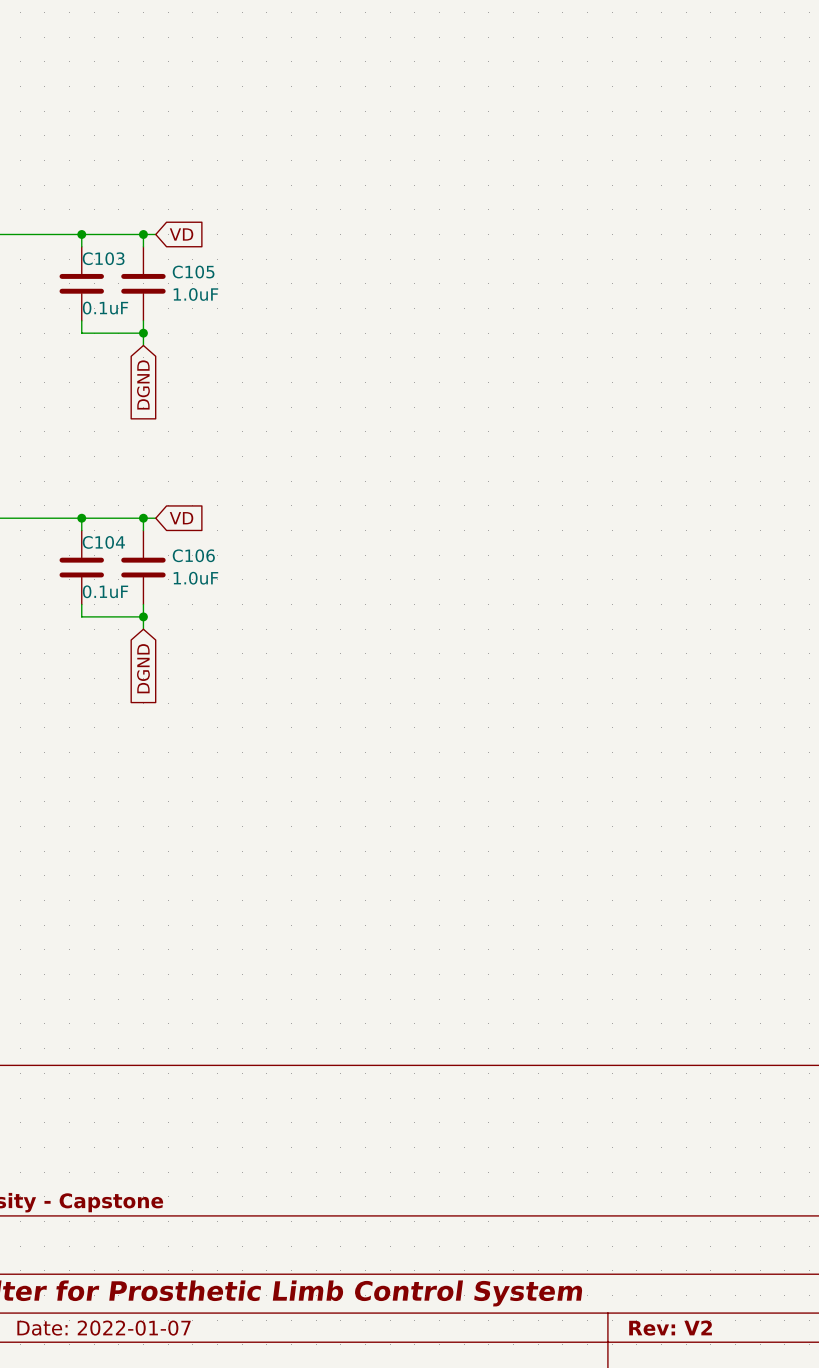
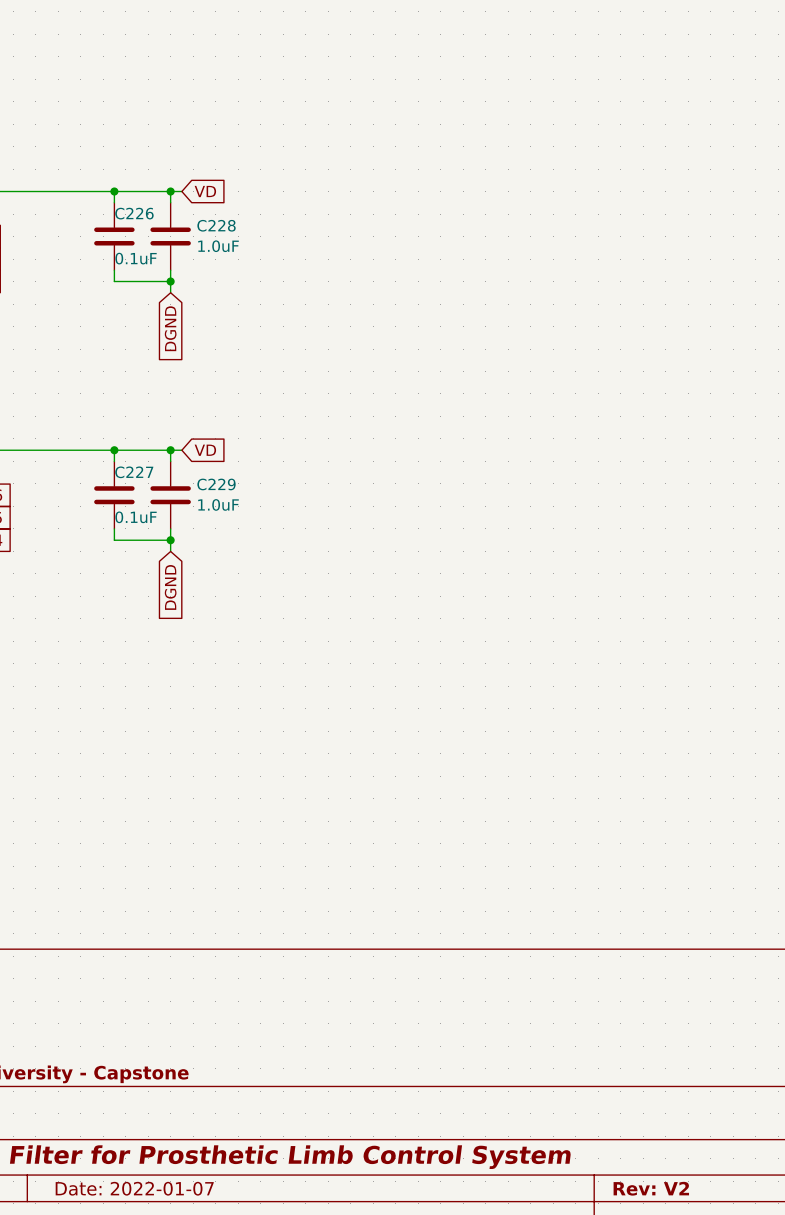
C103 name: C103 (103, 258) -> C226 (134, 213)
C105 name: C105 (193, 272) -> C228 (216, 225)
C104 name: C104 (103, 542) -> C227 (134, 472)
C106 name: C106 (193, 555) -> C229 (216, 484)

